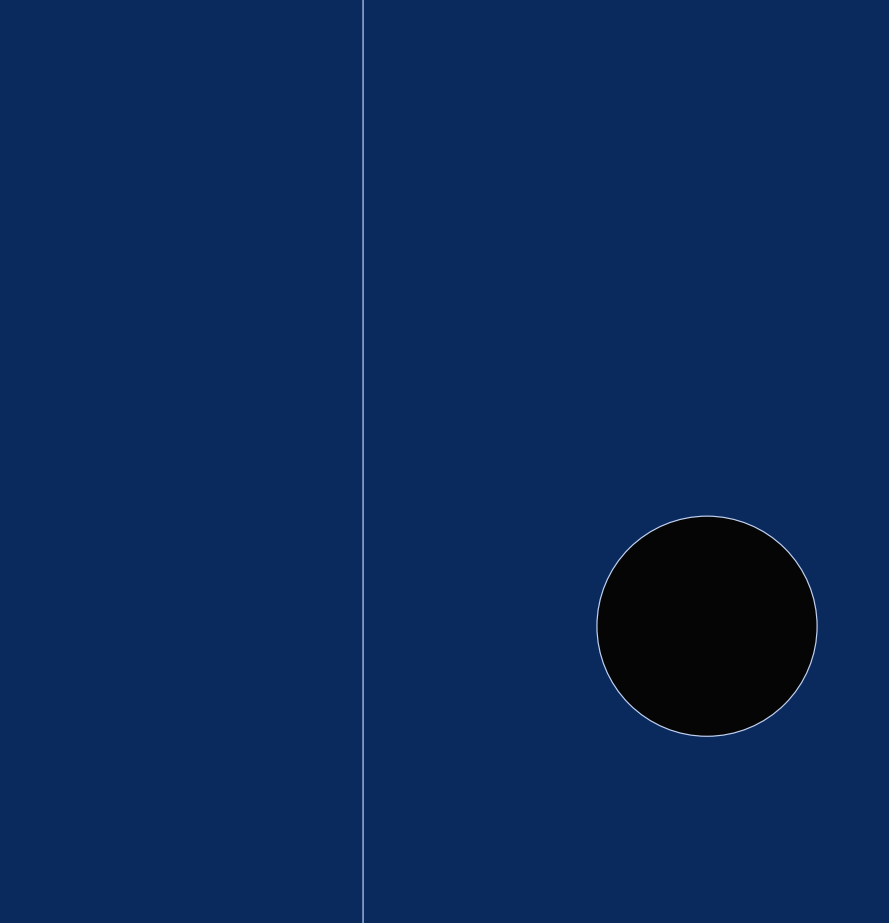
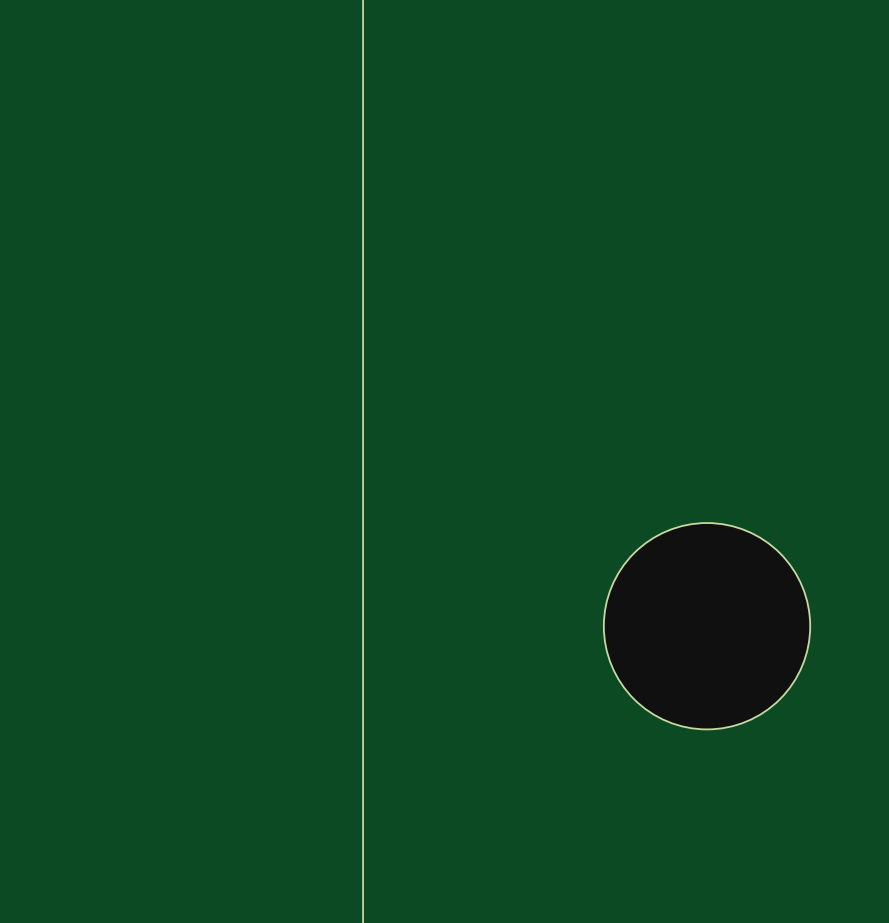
part footprint: [596, 516, 818, 737] -> [603, 523, 811, 730]

